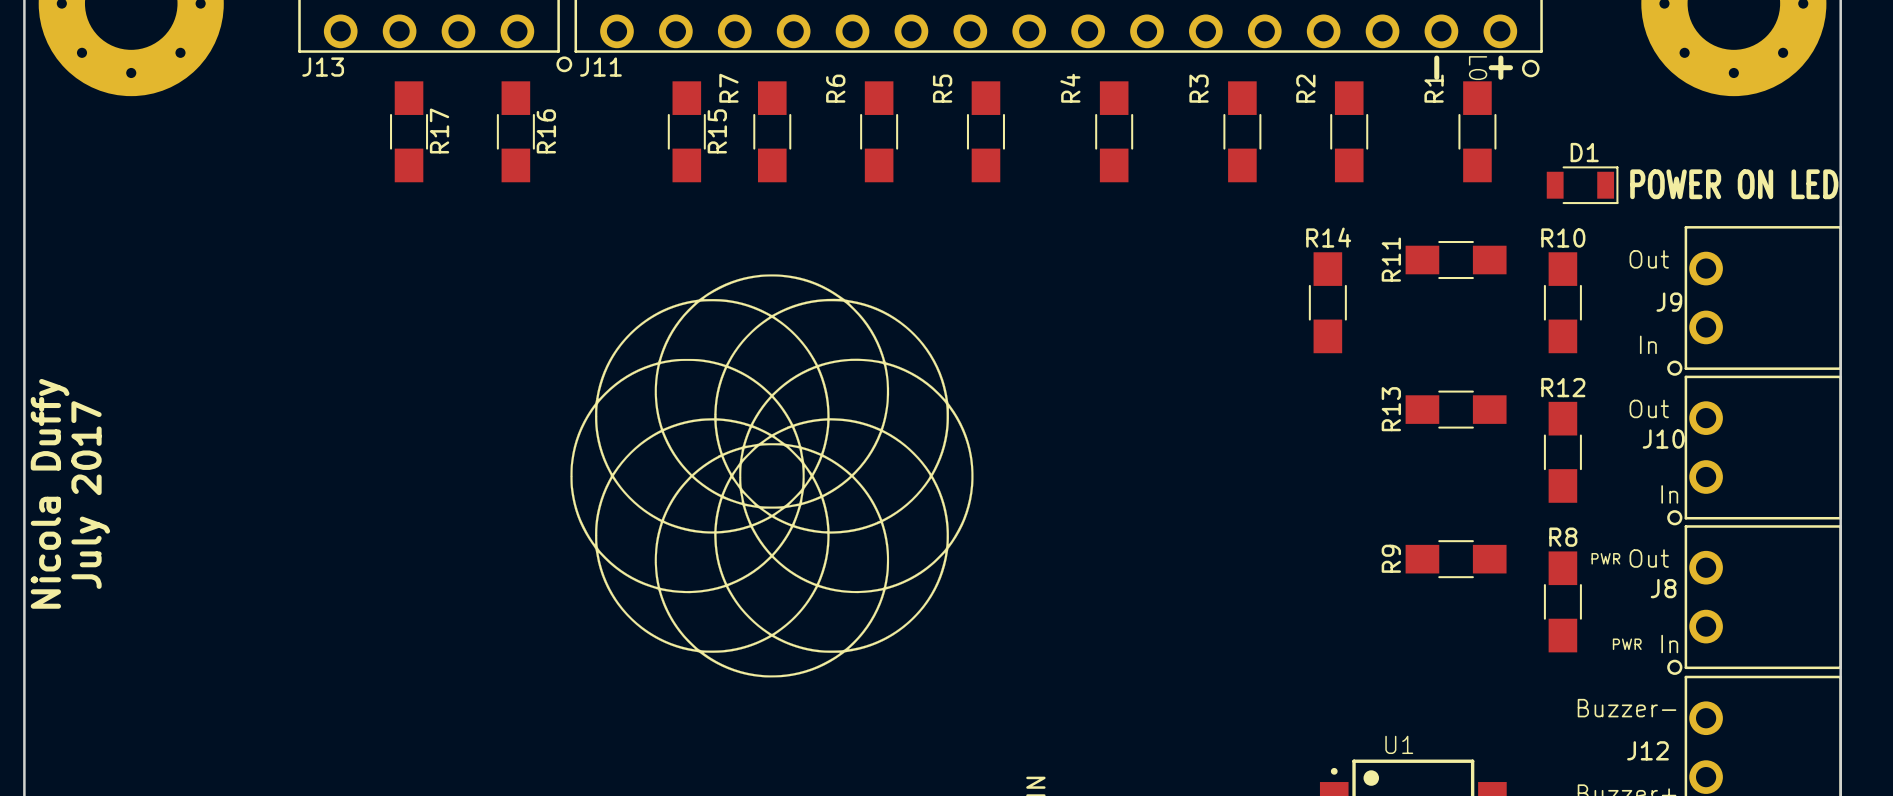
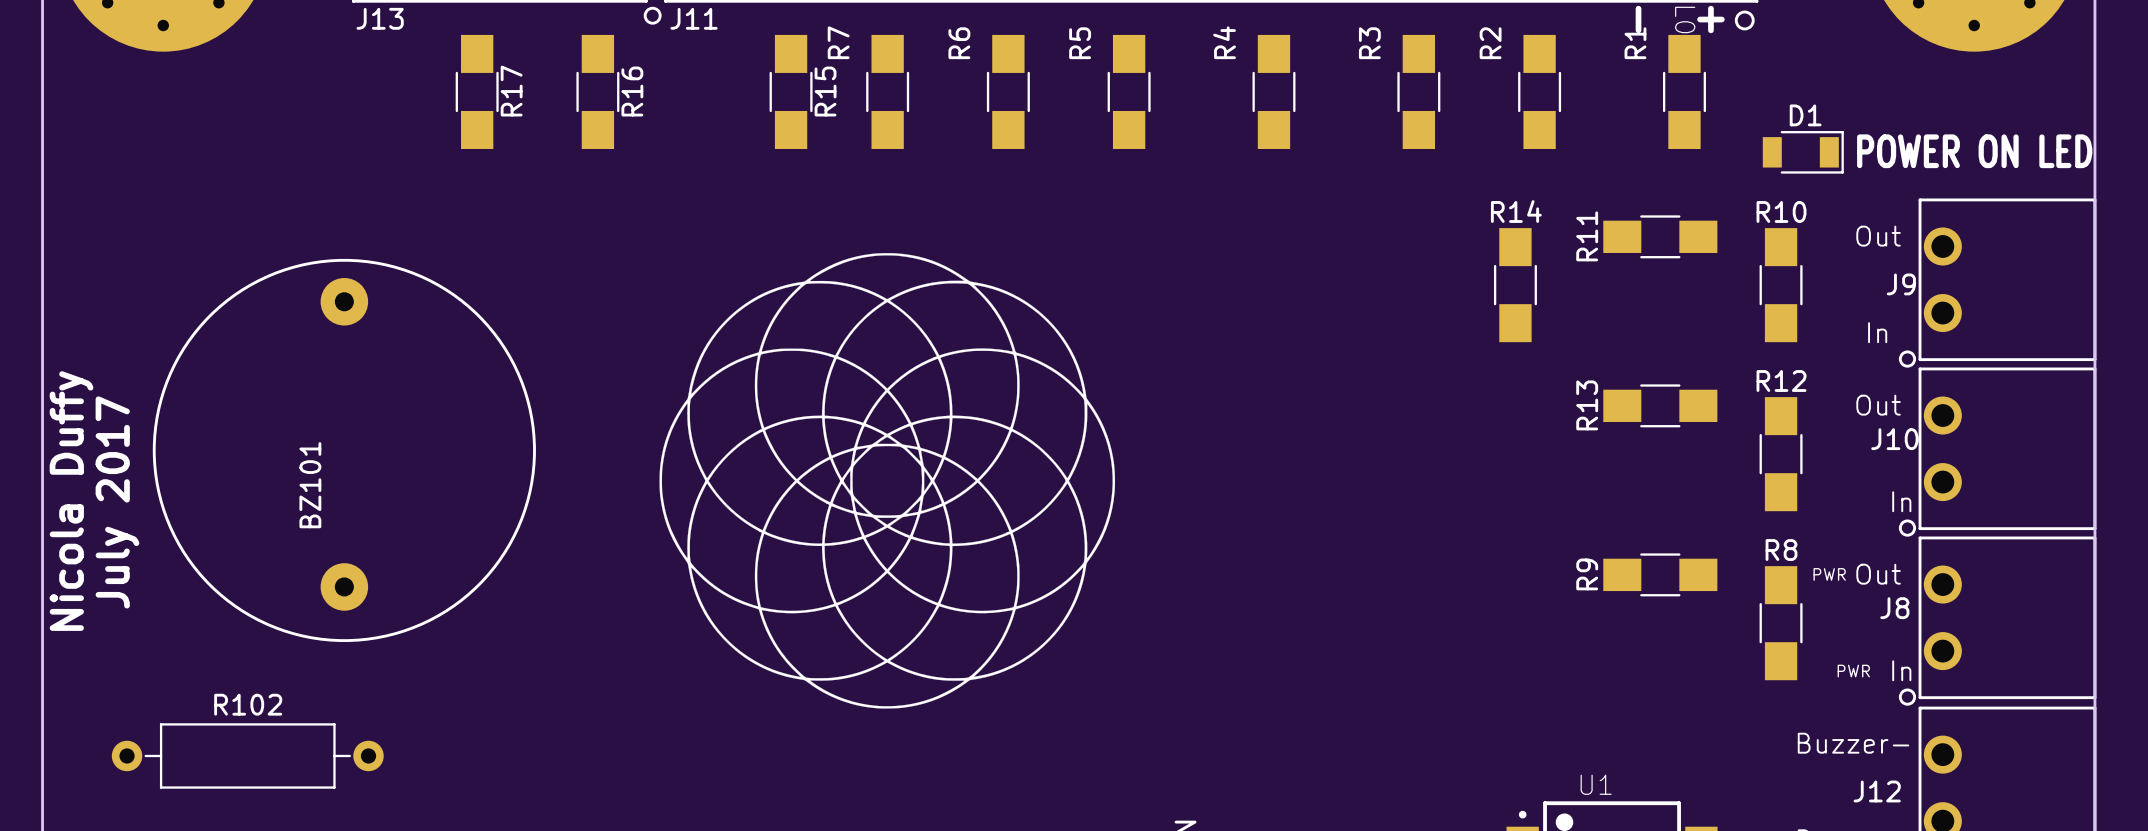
BZ101: none -> (344, 450)
R102: none -> (247, 755)

